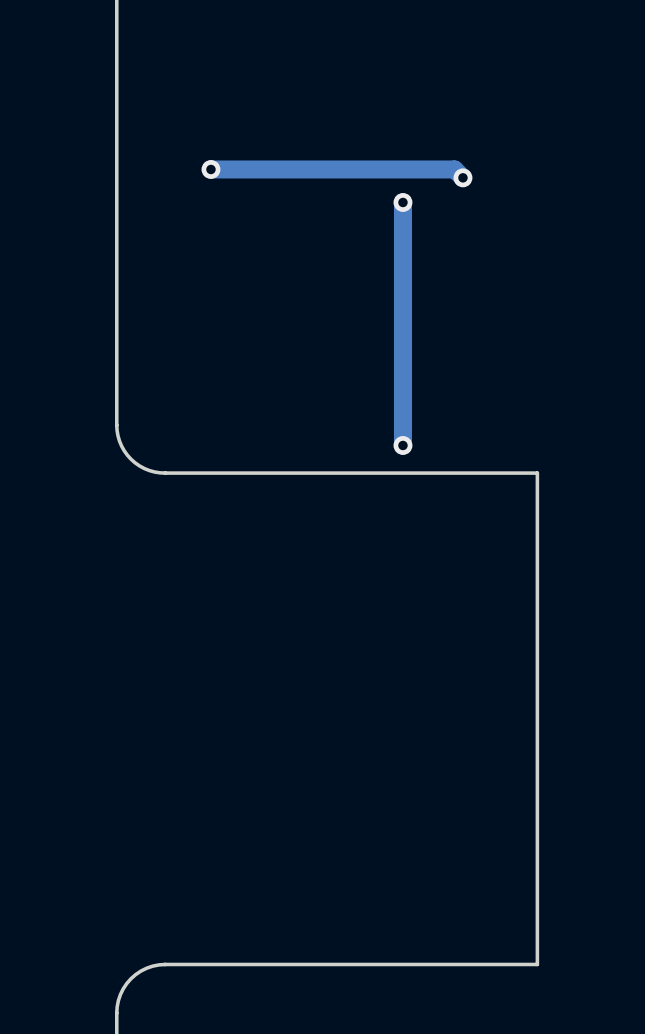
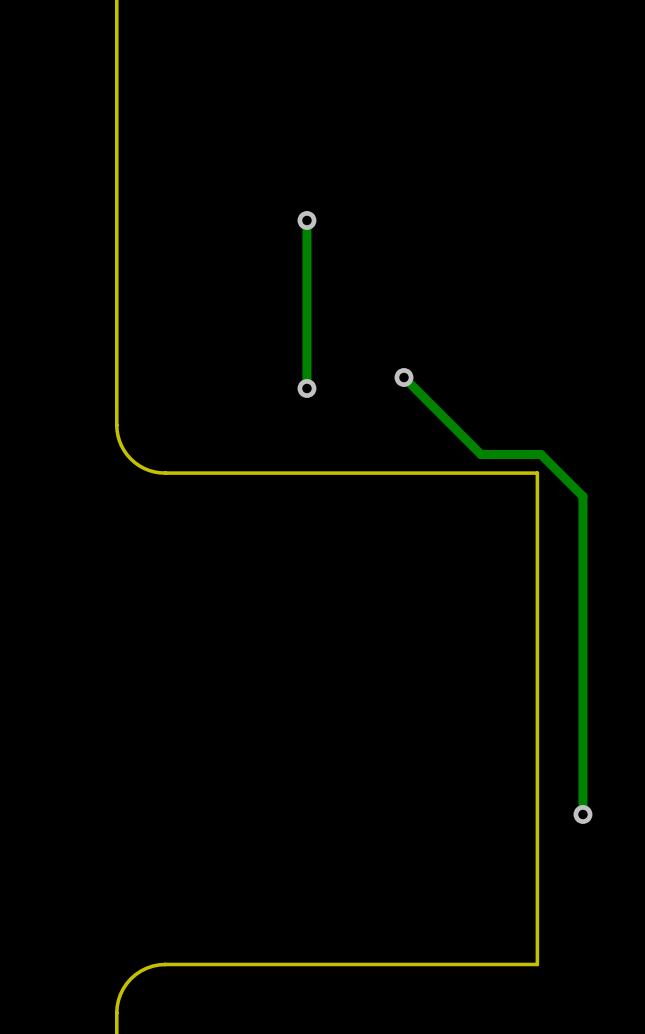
track: (210, 169) (454, 169) (462, 177) -> none
via: (210, 169) -> none
via: (462, 177) -> none
track: (402, 202) (402, 445) -> none
via: (402, 202) -> none
track: none -> (306, 220) (306, 388)
via: none -> (306, 220)
track: none -> (403, 377) (480, 454) (540, 454) (582, 496) (582, 814)
via: none -> (403, 377)
via: none -> (306, 388)
via: (402, 445) -> none
via: none -> (582, 814)

